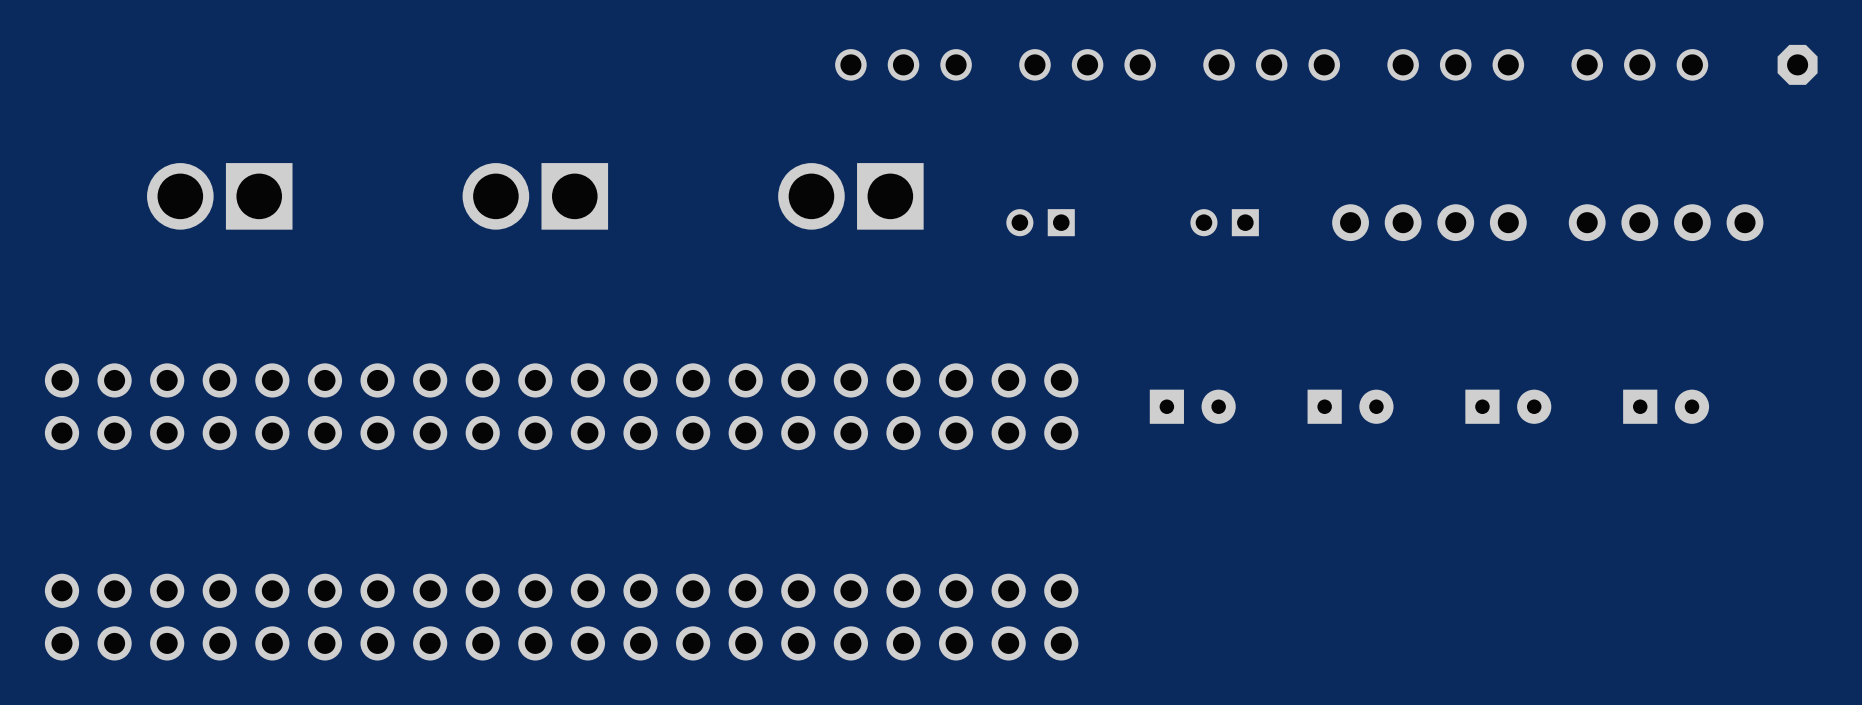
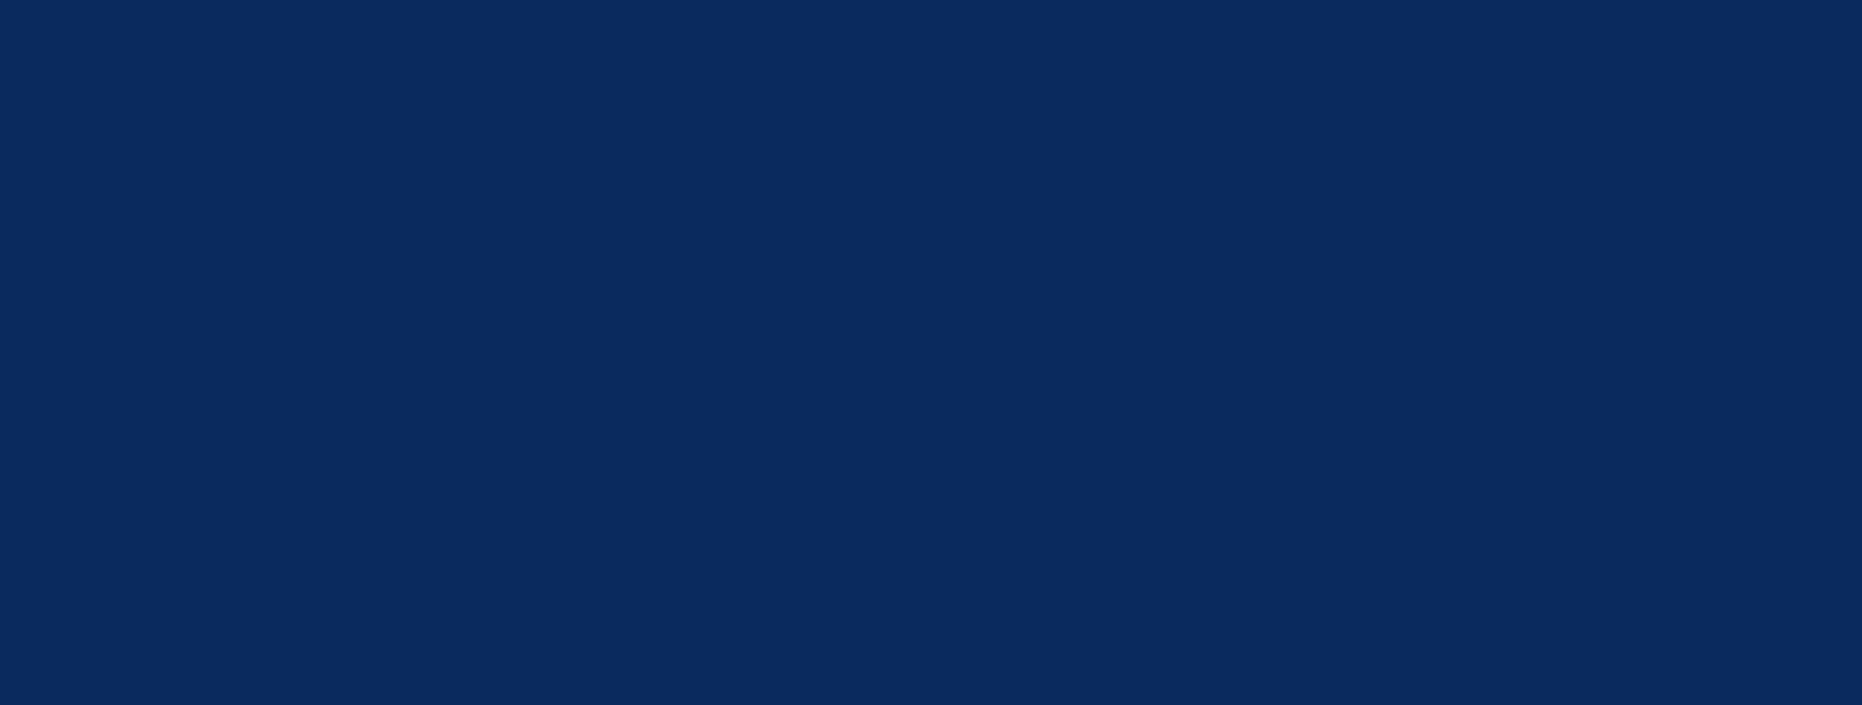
part: (903, 64) -> none
part: (1087, 64) -> none
part: (1271, 64) -> none
part: (1455, 64) -> none
part: (1639, 64) -> none
part: (1797, 64) -> none
part: (219, 196) -> none
part: (535, 196) -> none
part: (850, 196) -> none
part: (1040, 222) -> none
part: (1224, 222) -> none
part: (1429, 222) -> none
part: (1666, 222) -> none
part: (561, 406) -> none
part: (1192, 406) -> none
part: (1350, 406) -> none
part: (1508, 406) -> none
part: (1666, 406) -> none
part: (561, 617) -> none

